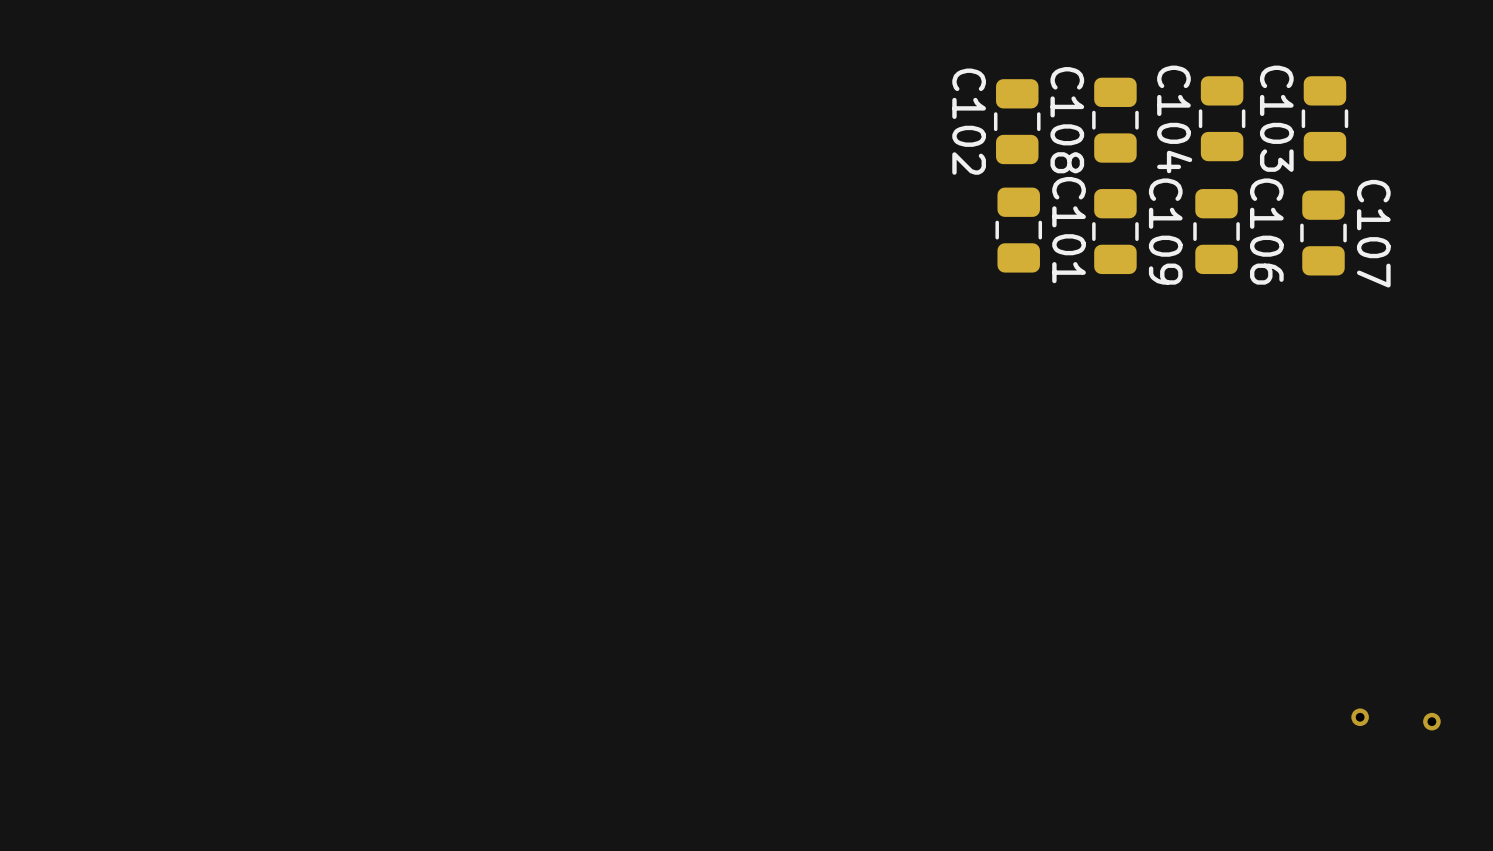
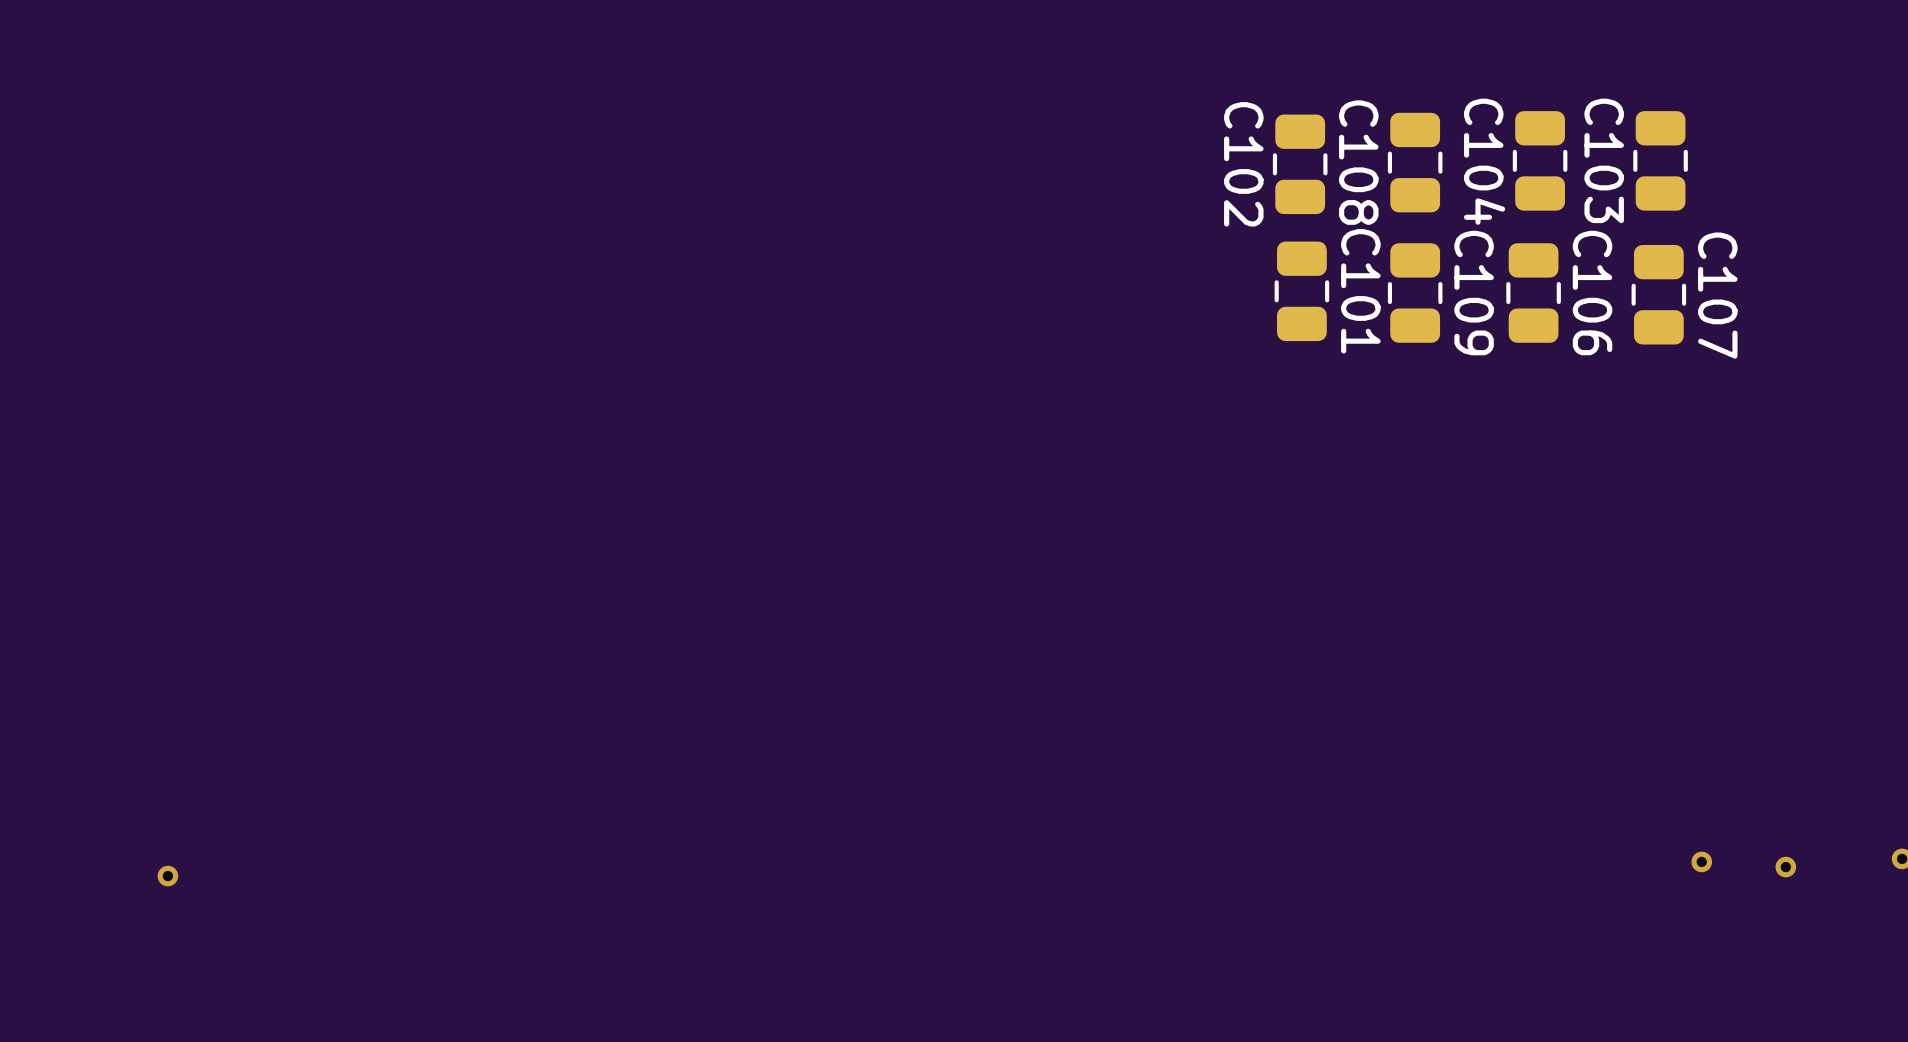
via: none -> (167, 876)

